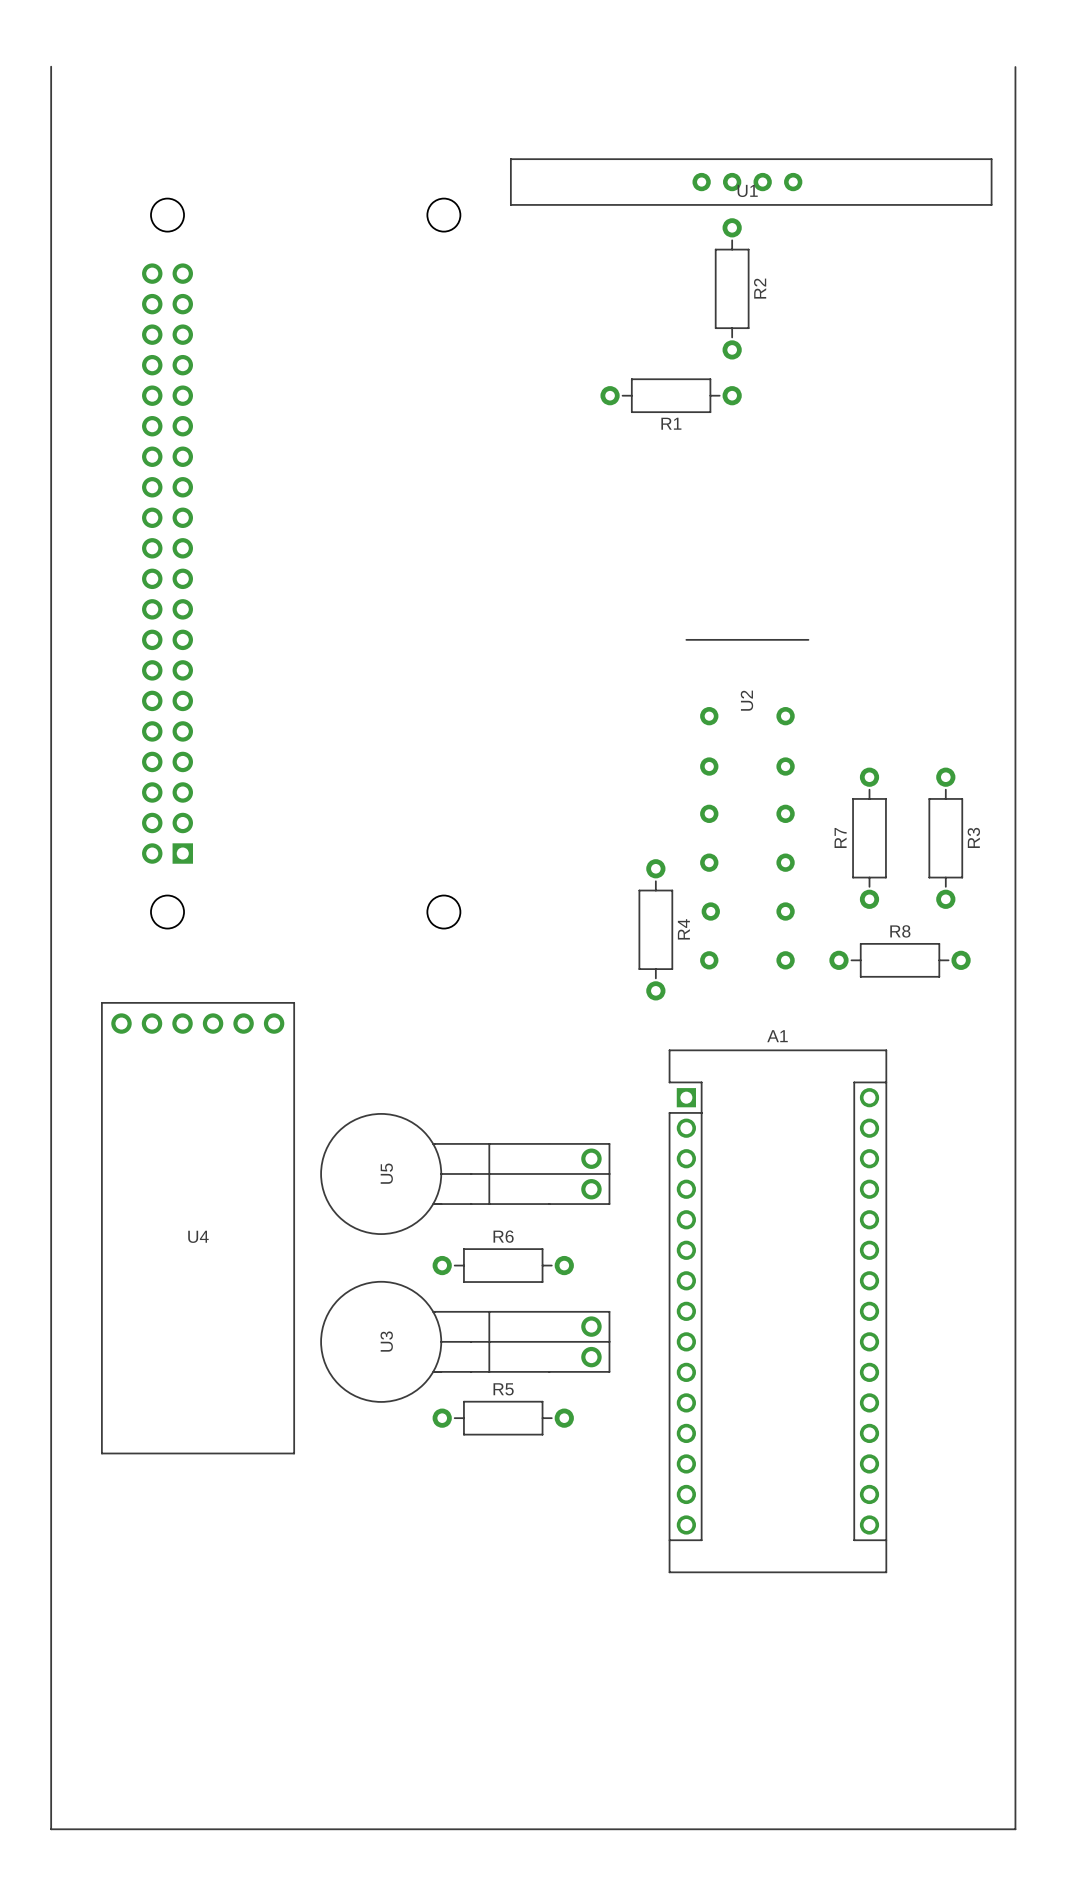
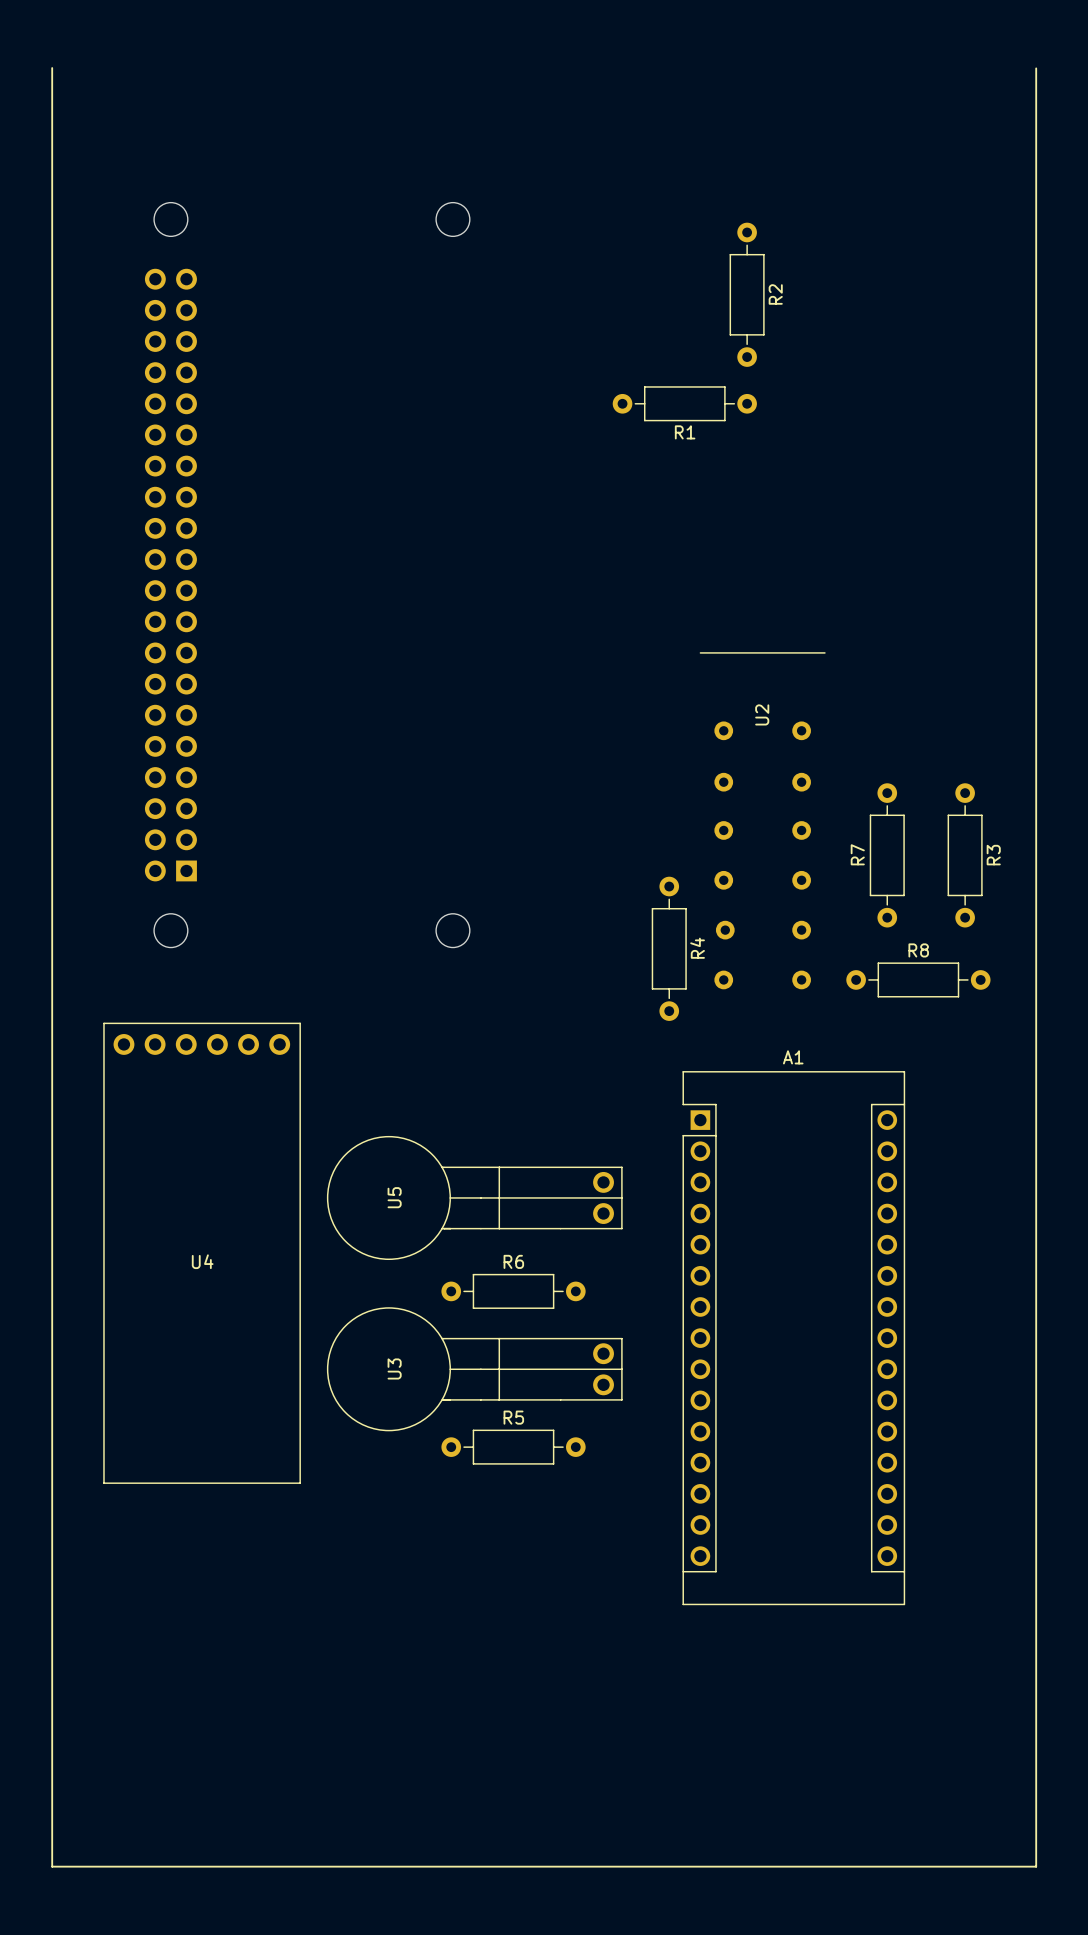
U1: (751, 182) -> none

